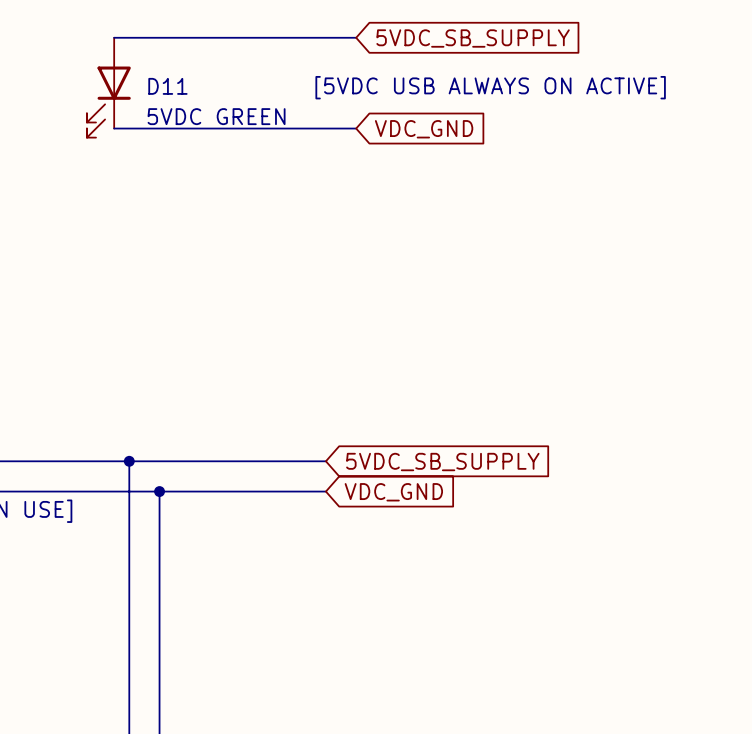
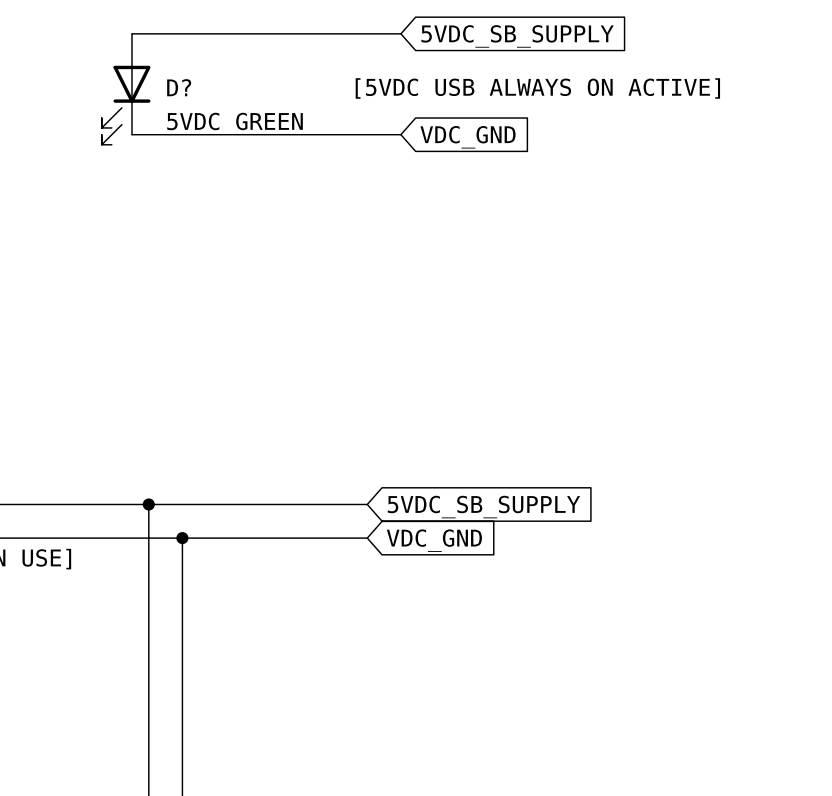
D11 name: D11 (167, 86) -> D? (179, 87)

